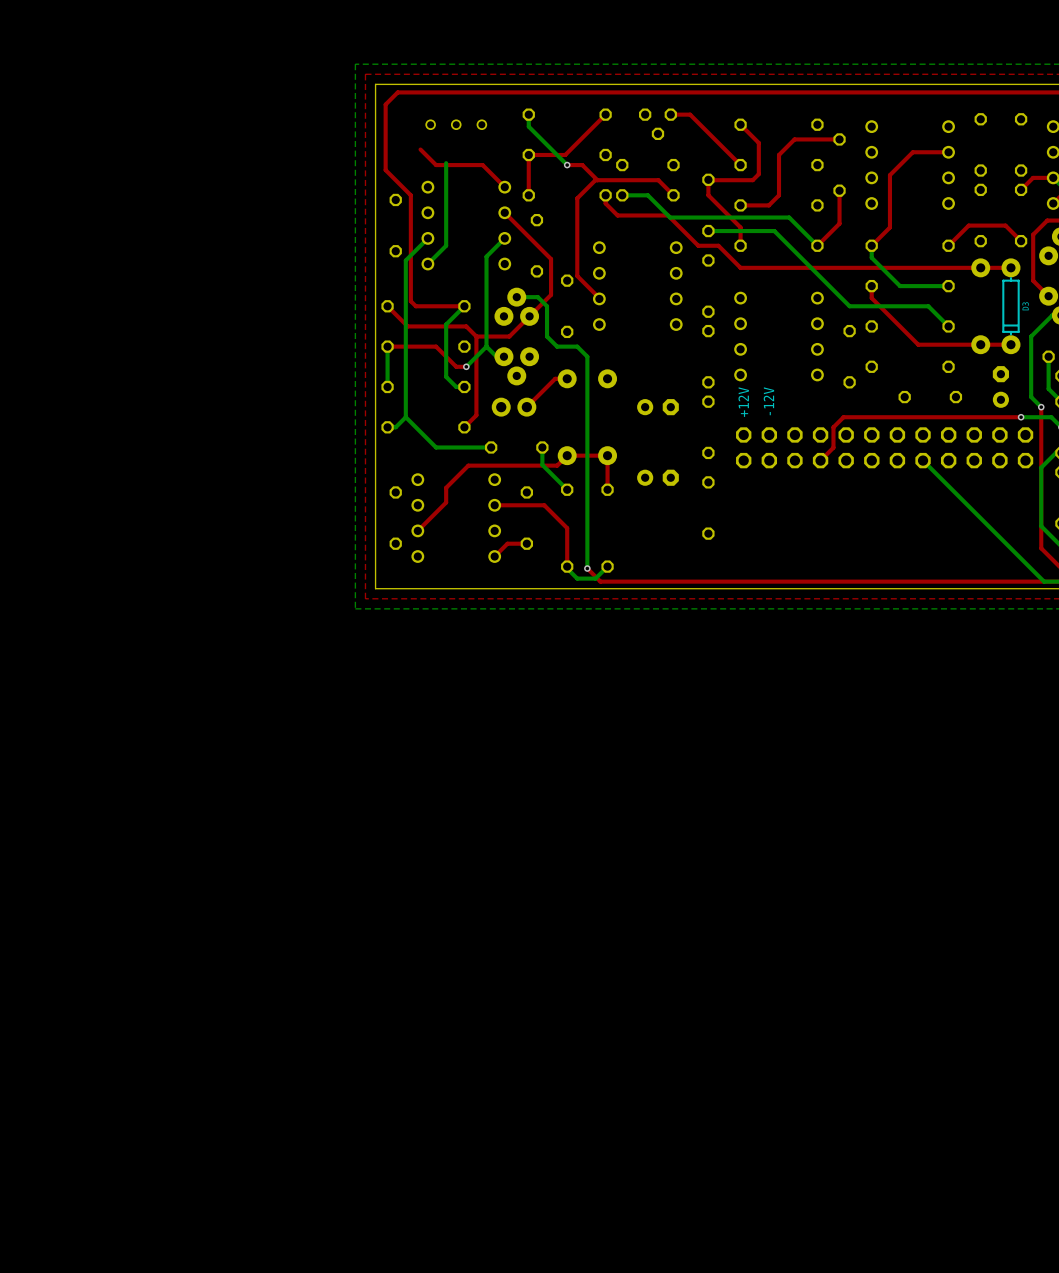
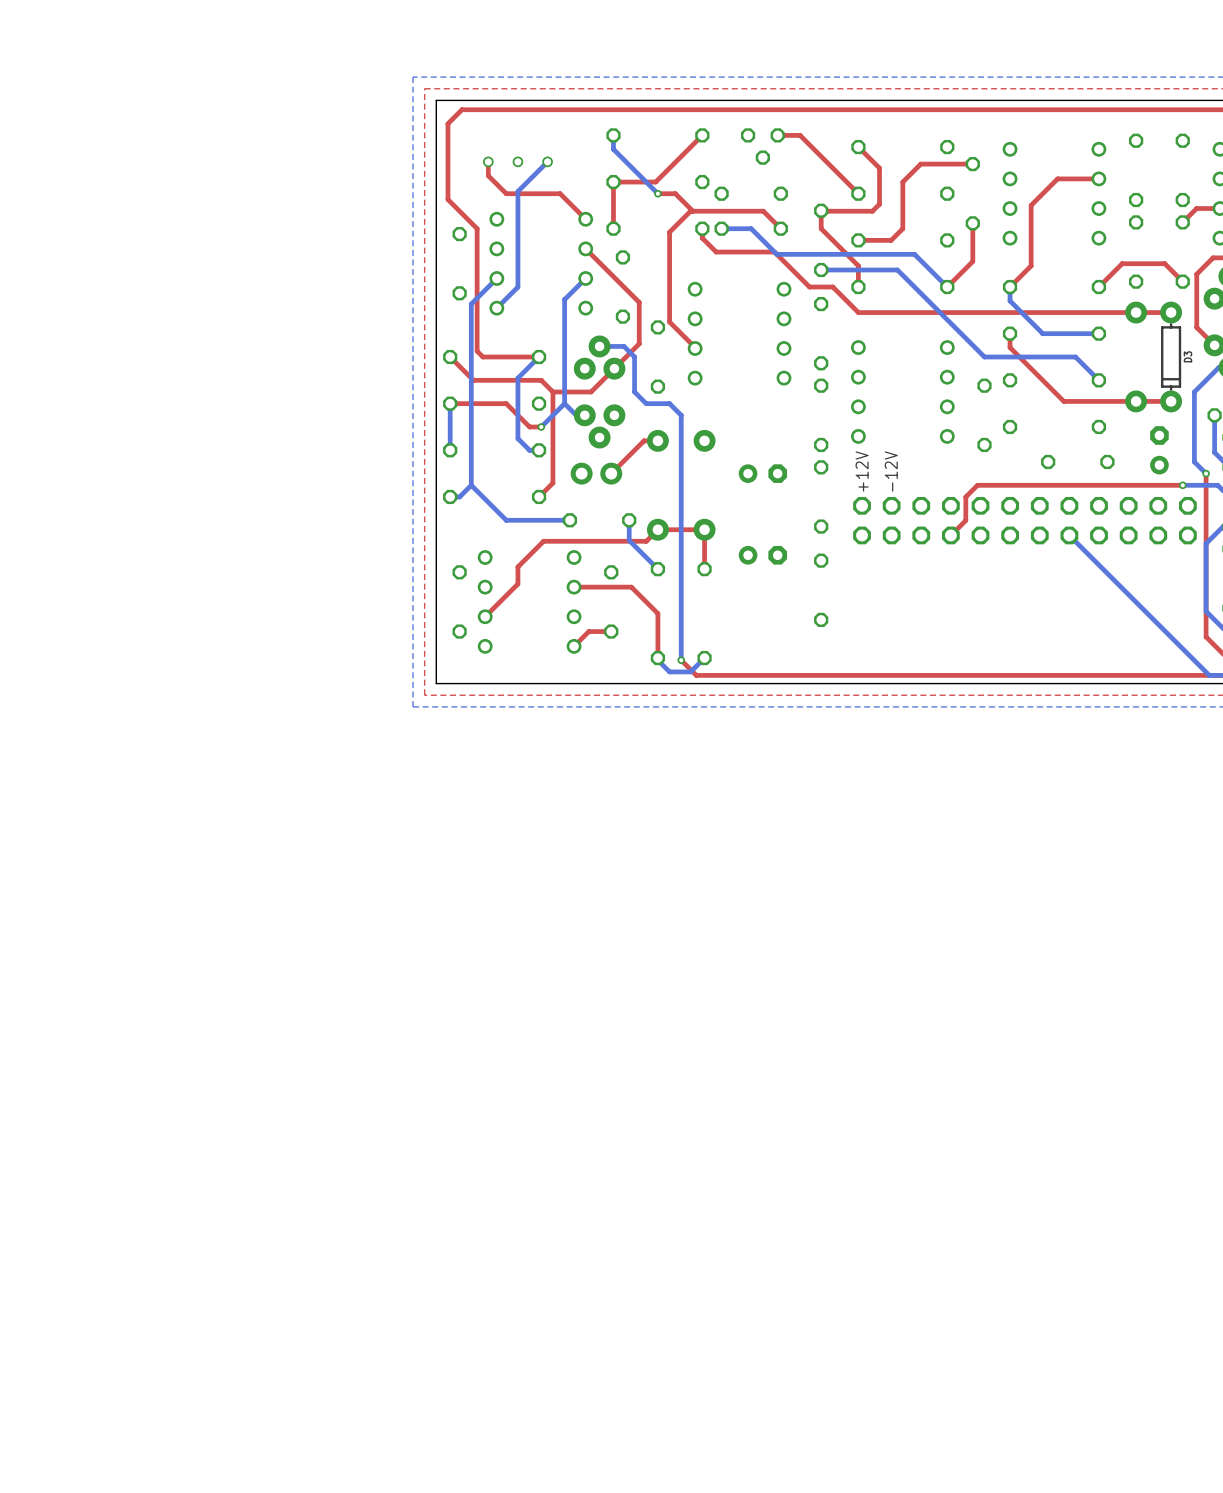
part: (456, 124) -> none
top track: none -> (488, 161) (488, 175)
part: none -> (517, 161)
bottom track: none -> (547, 161) (517, 191)

